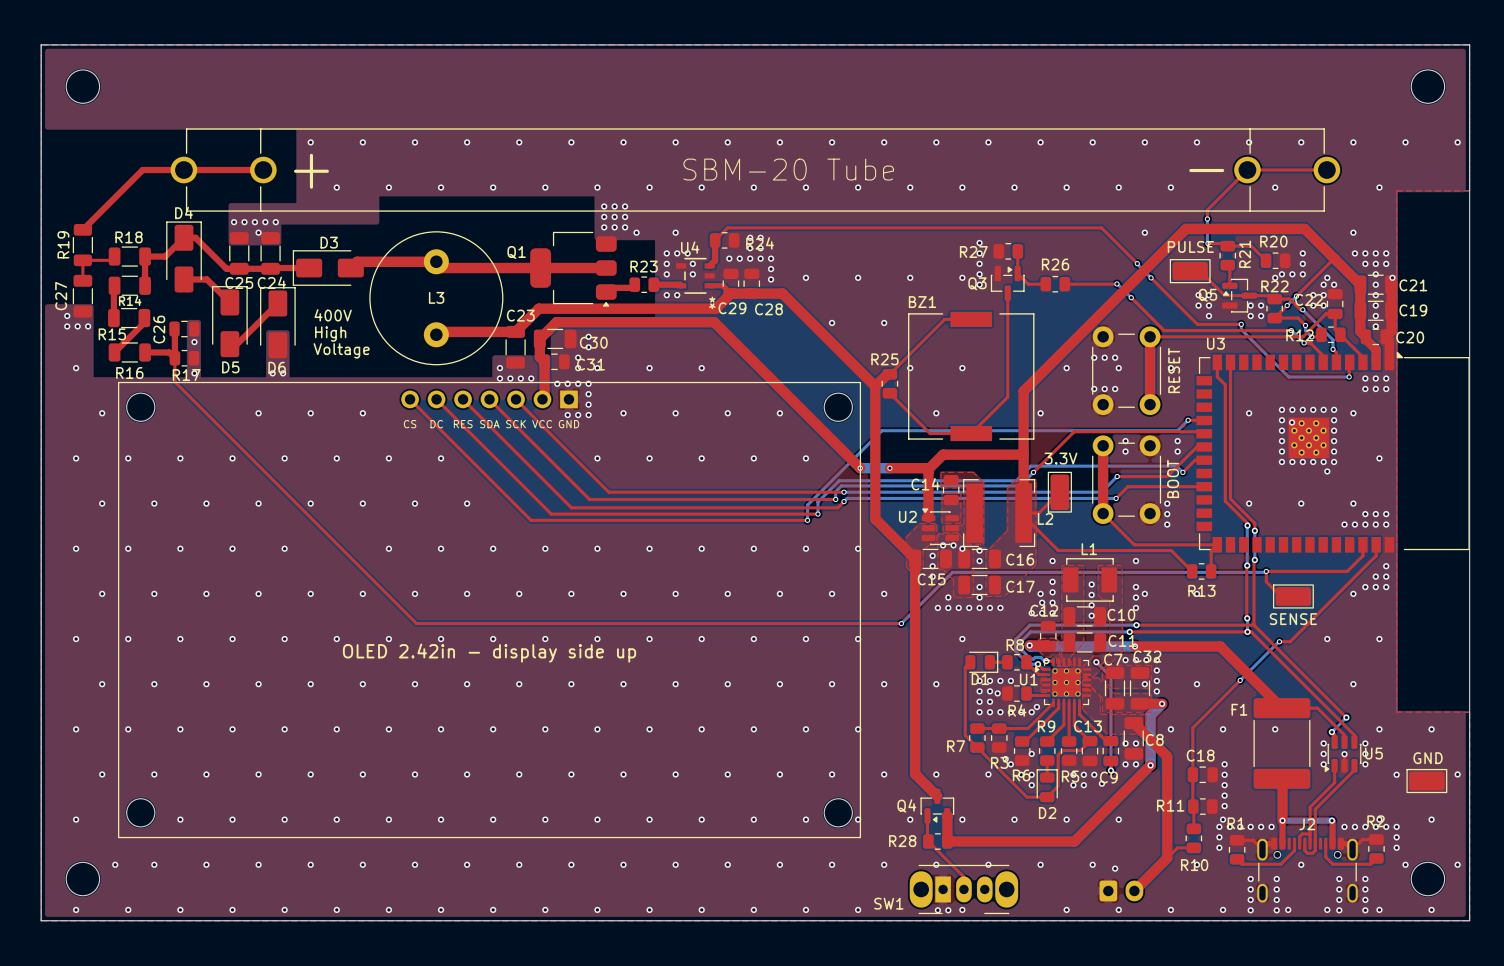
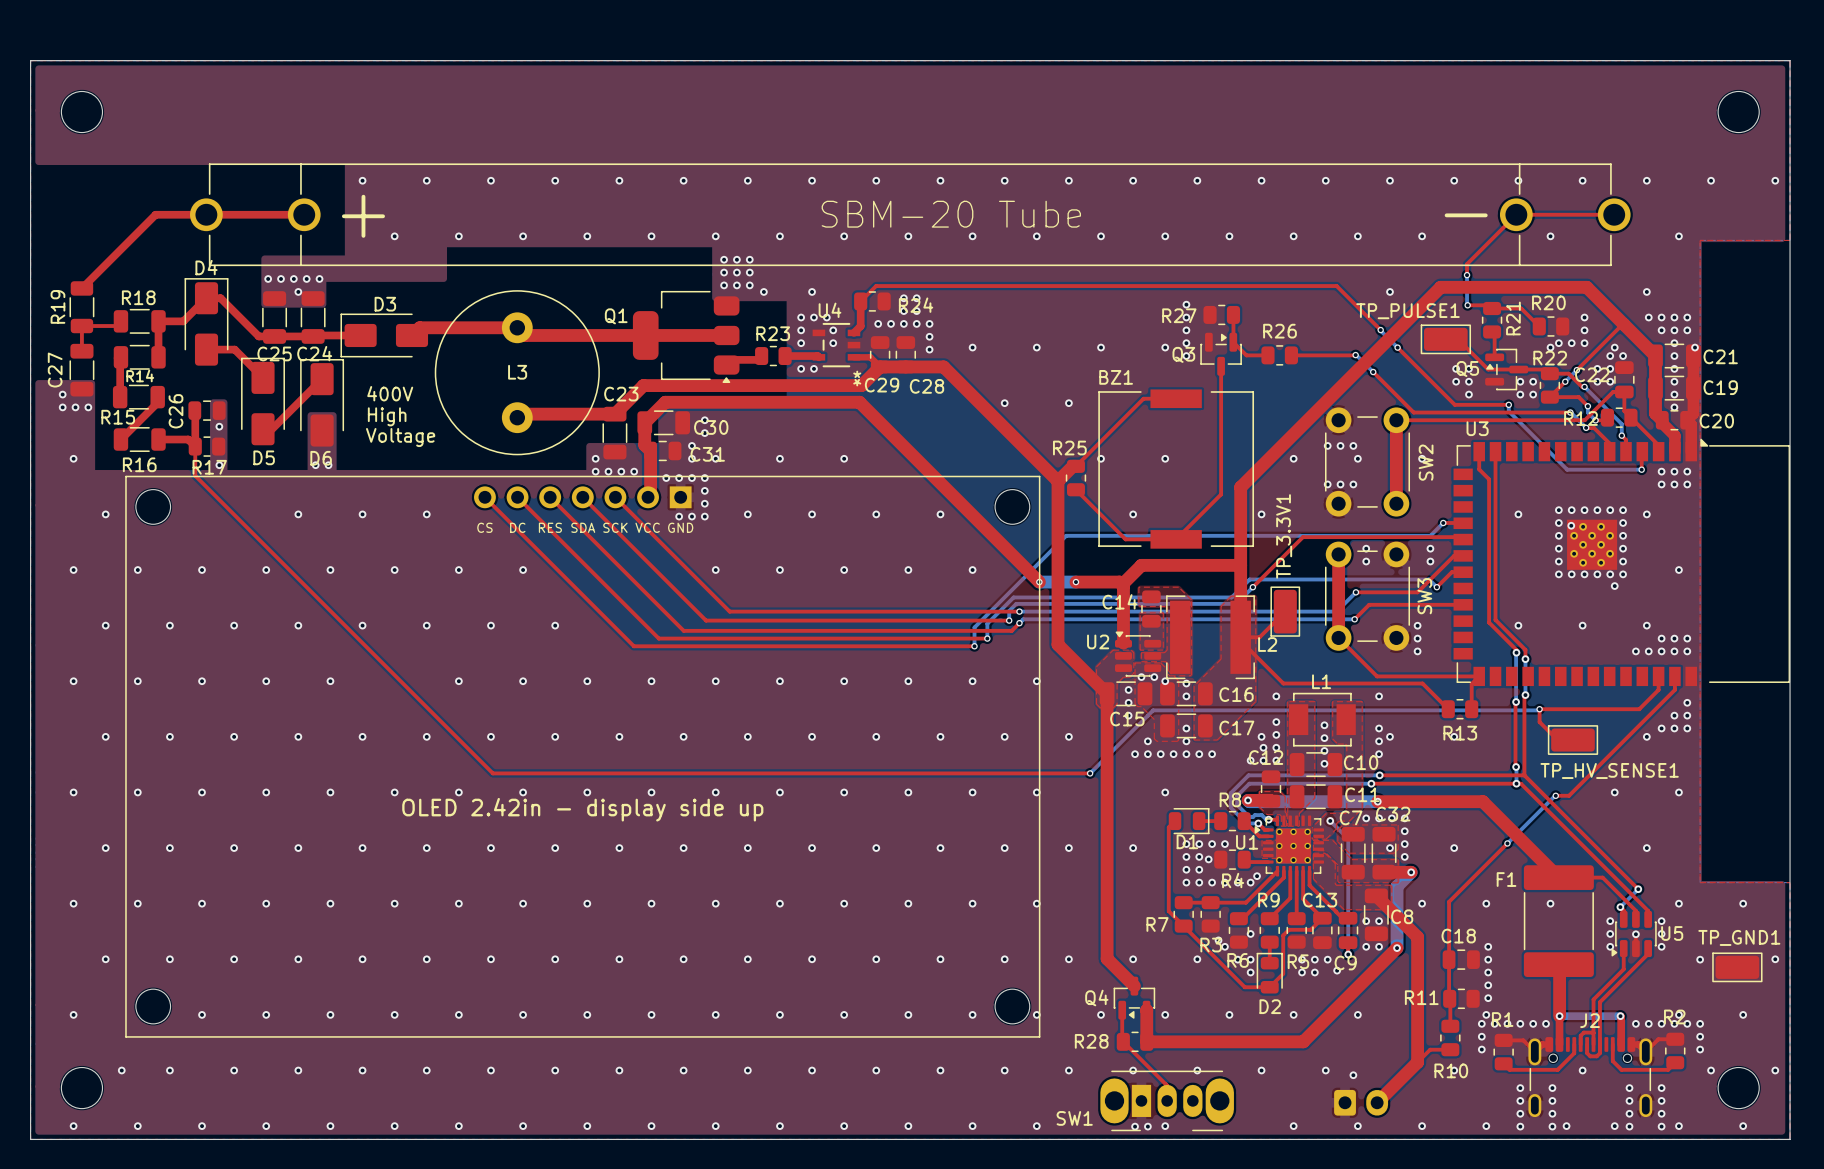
PULSE name: PULSE (1190, 246) -> TP_PULSE1 (1407, 311)
RESET name: RESET (1174, 370) -> SW2 (1426, 462)
3.3V name: 3.3V (1061, 458) -> TP_3.3V1 (1284, 536)
BOOT name: BOOT (1173, 478) -> SW3 (1424, 596)
SENSE name: SENSE (1293, 619) -> TP_HV_SENSE1 (1609, 770)
GND name: GND (1428, 758) -> TP_GND1 (1739, 937)

